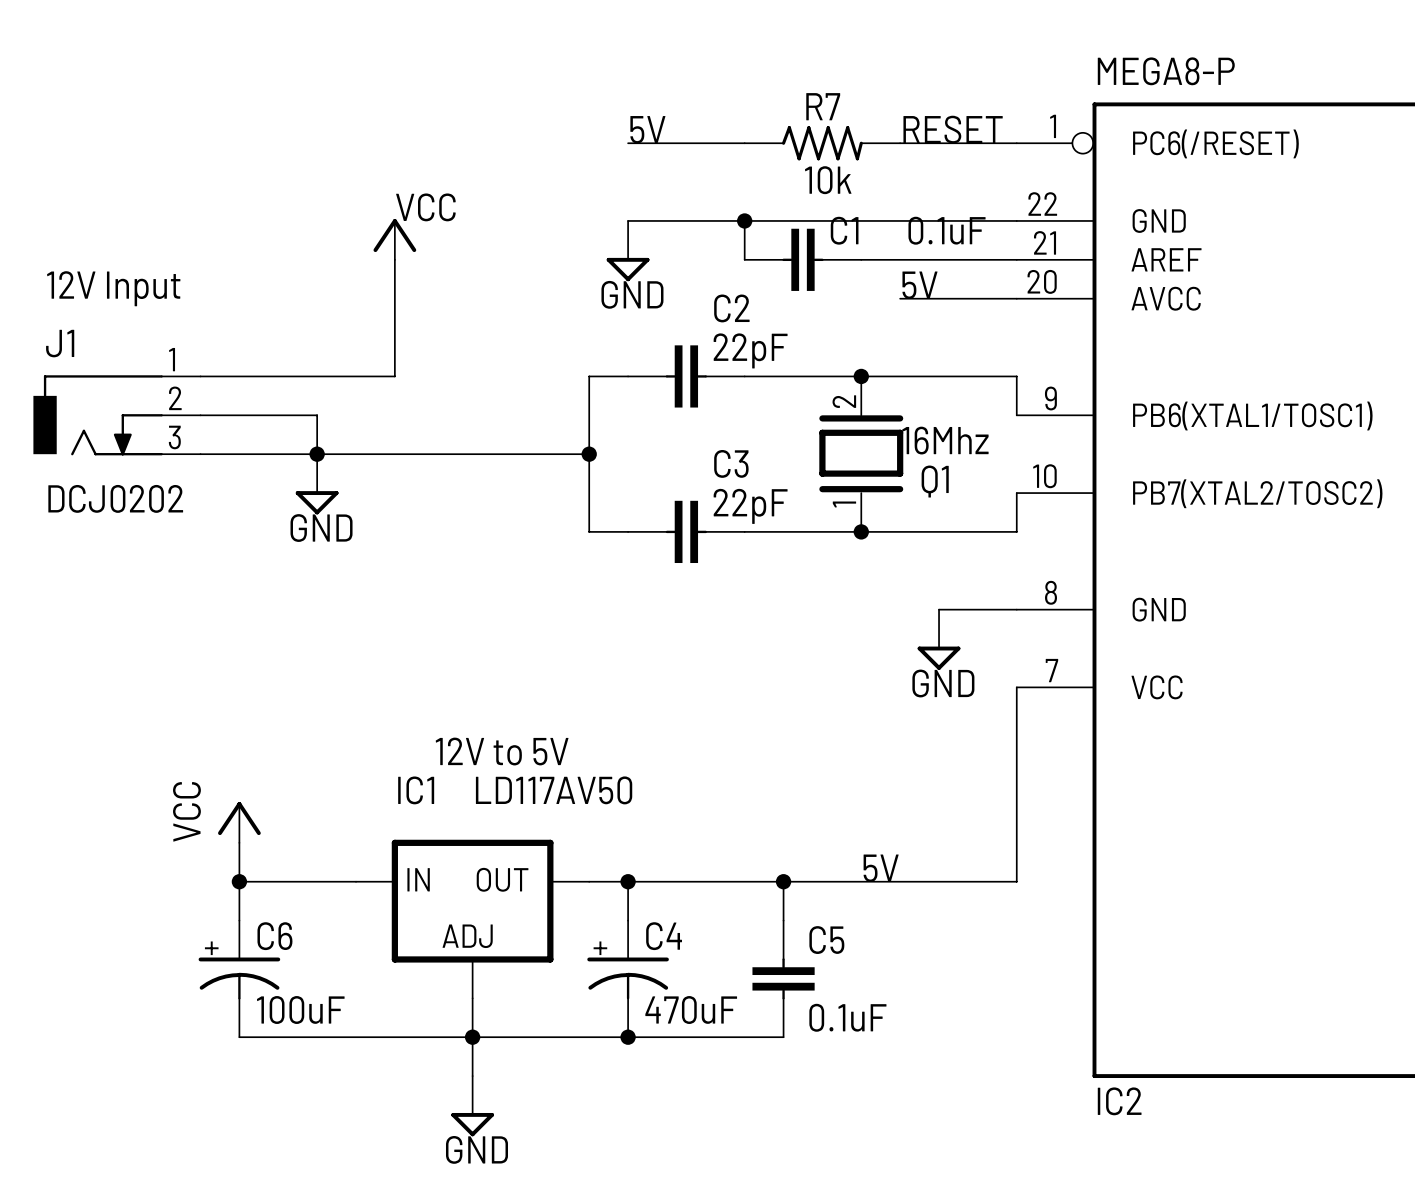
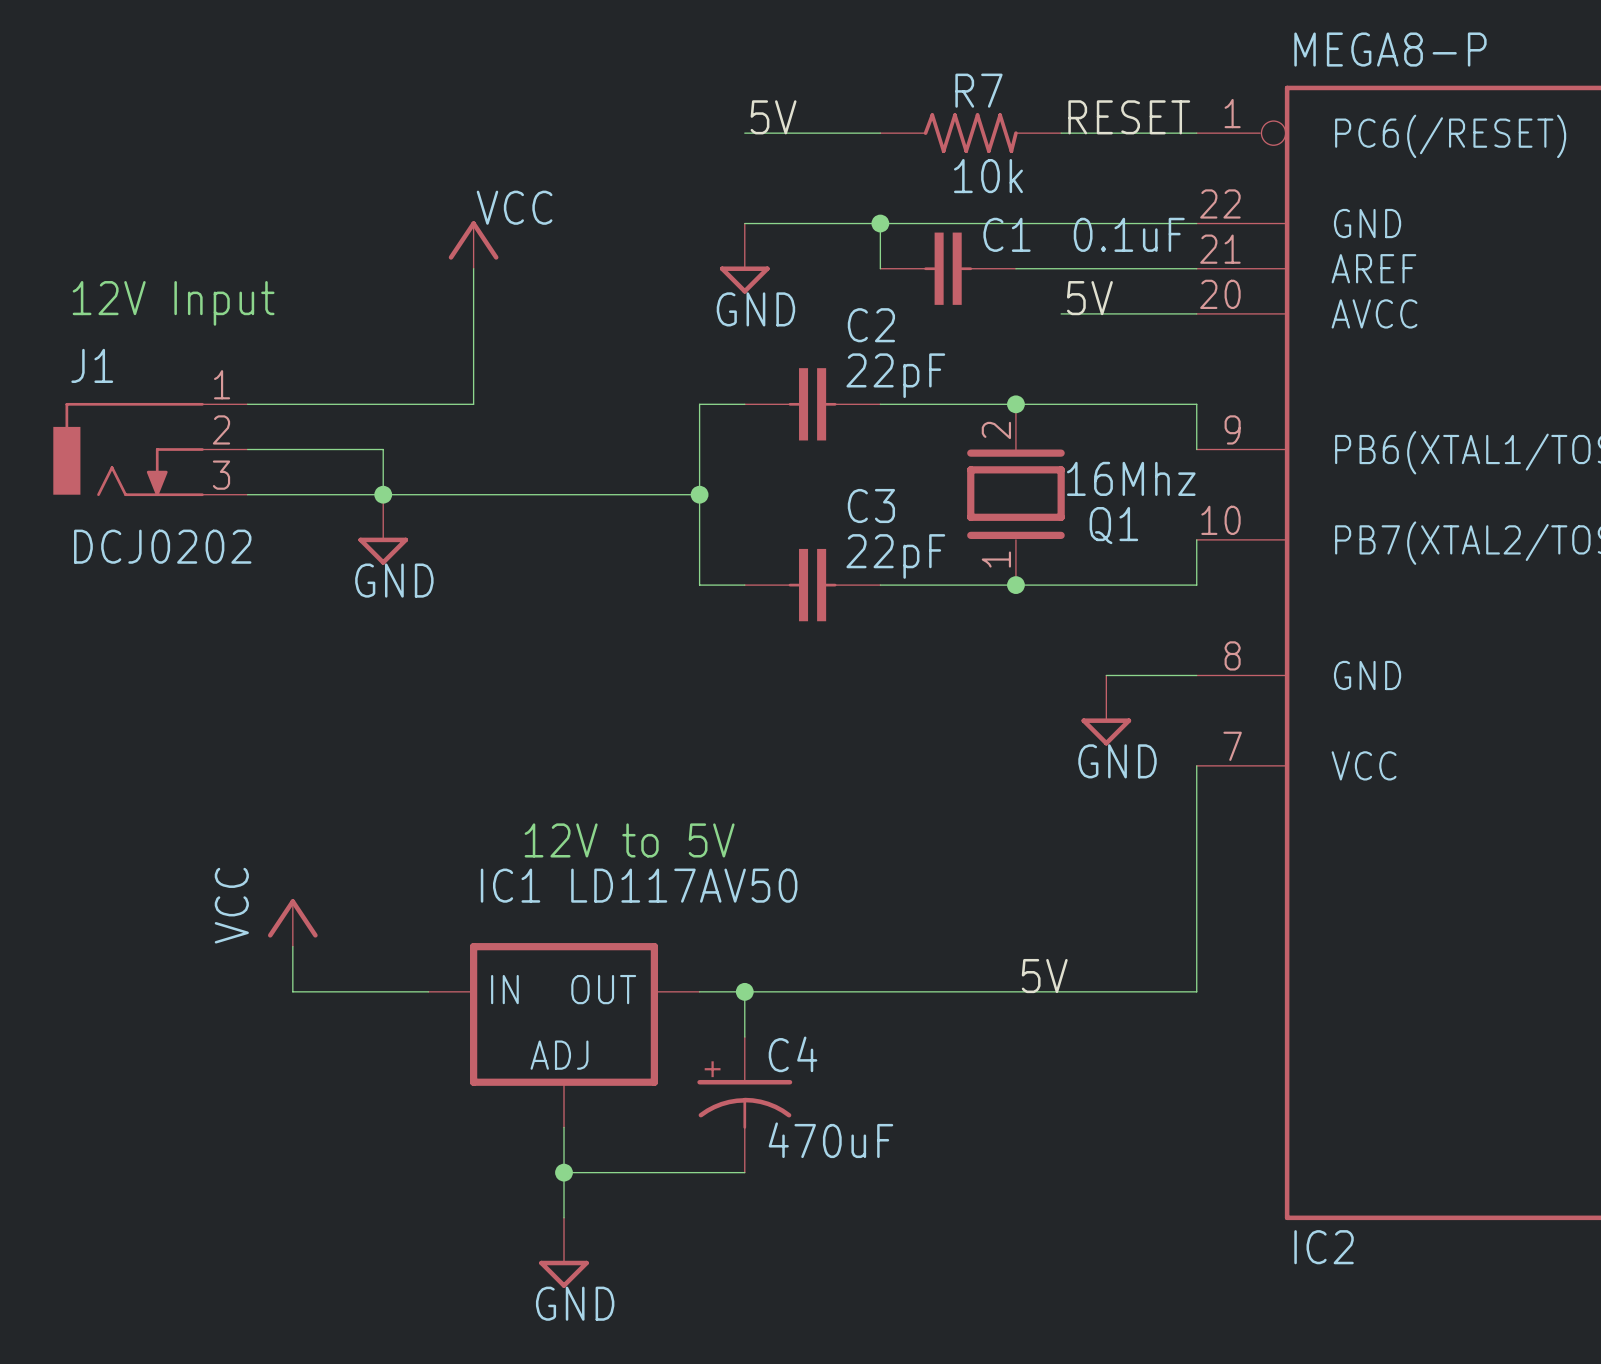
wire: (239, 881) (239, 920) -> none
junction: (239, 881) -> none
wire: (783, 881) (783, 920) -> none
junction: (783, 881) -> none
C6: 100uF (239, 978) -> none
C5: 0.1uF (783, 978) -> none
wire: (239, 1037) (472, 1037) -> none
wire: (628, 1037) (783, 1037) -> none
junction: (628, 1037) -> none

